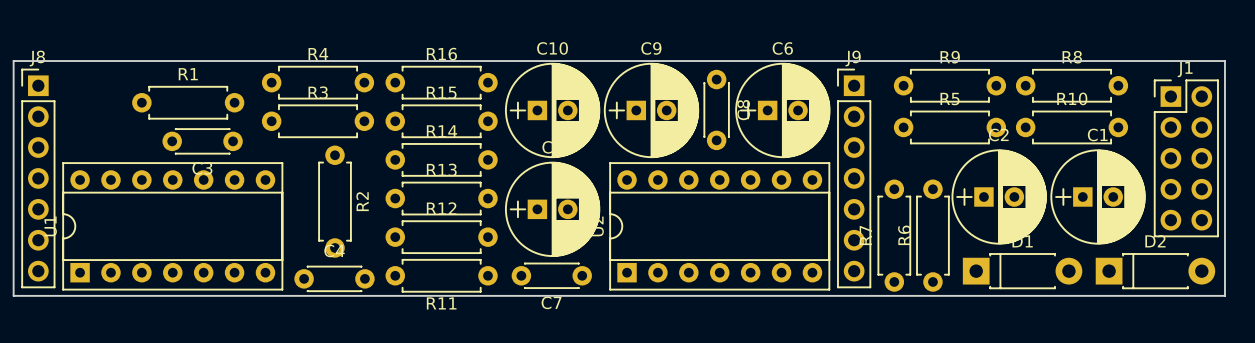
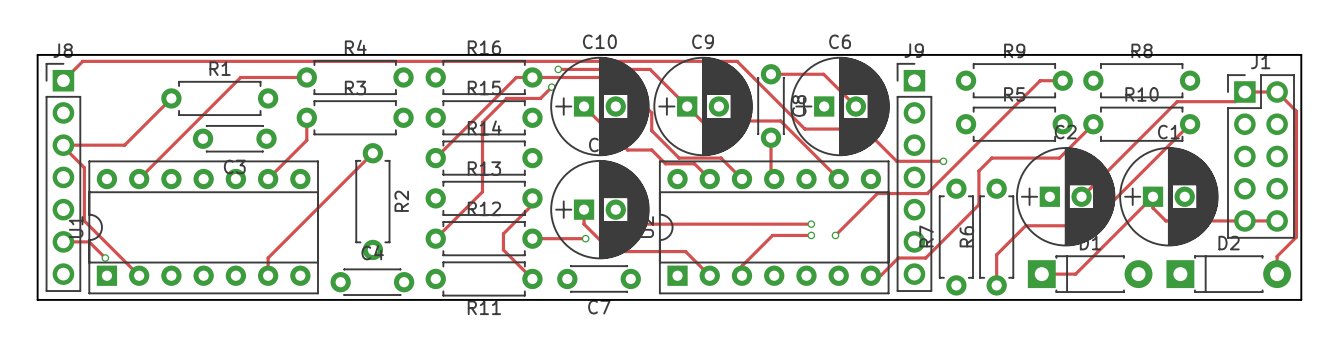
track: none -> (558, 69) (650, 69) (709, 129) (732, 129) (740, 121) (780, 121) (838, 179)
via: none -> (558, 69)
track: none -> (771, 74) (823, 74) (855, 106)
track: none -> (306, 77) (240, 77) (139, 179)
track: none -> (63, 80) (82, 61) (737, 61) (804, 129) (864, 129) (896, 161) (943, 161)
track: none -> (1062, 80) (1040, 80) (927, 193) (877, 193) (835, 235)
track: none -> (551, 87) (540, 98) (506, 98) (482, 122) (482, 191) (435, 238)
via: none -> (551, 87)
track: none -> (171, 98) (124, 145) (63, 145) (84, 167) (84, 220) (139, 275)
track: none -> (584, 106) (627, 150) (651, 150) (665, 163) (694, 163) (709, 179)
track: none -> (306, 117) (306, 140) (268, 179)
track: none -> (1093, 124) (1059, 158) (991, 158) (978, 170) (978, 204) (925, 258) (898, 258) (880, 275) (870, 275)
track: none -> (1190, 124) (1088, 225) (1025, 225) (996, 254) (996, 285)
track: none -> (771, 137) (771, 175) (774, 179)
track: none -> (372, 153) (268, 258) (268, 275)
track: none -> (435, 158) (516, 77) (616, 77) (651, 112) (651, 130) (679, 158) (721, 158) (741, 179)
via: none -> (943, 161)
track: none -> (1081, 196) (1177, 101) (1235, 101) (1244, 91) (1277, 91) (1296, 111) (1296, 237) (1277, 256) (1277, 274)
track: none -> (532, 198) (532, 204) (503, 233) (503, 249) (532, 278)
track: none -> (584, 209) (584, 224) (611, 251) (685, 251) (709, 275)
track: none -> (1277, 220) (1165, 220) (1153, 208) (1153, 196) (1075, 274) (1041, 274)
track: none -> (811, 224) (642, 224) (627, 238)
via: none -> (811, 224)
track: none -> (811, 235) (772, 235) (741, 266) (741, 275)
via: none -> (811, 235)
via: none -> (835, 235)
track: none -> (532, 238) (585, 238)
via: none -> (585, 238)
track: none -> (63, 241) (89, 241) (105, 258)
via: none -> (105, 258)

